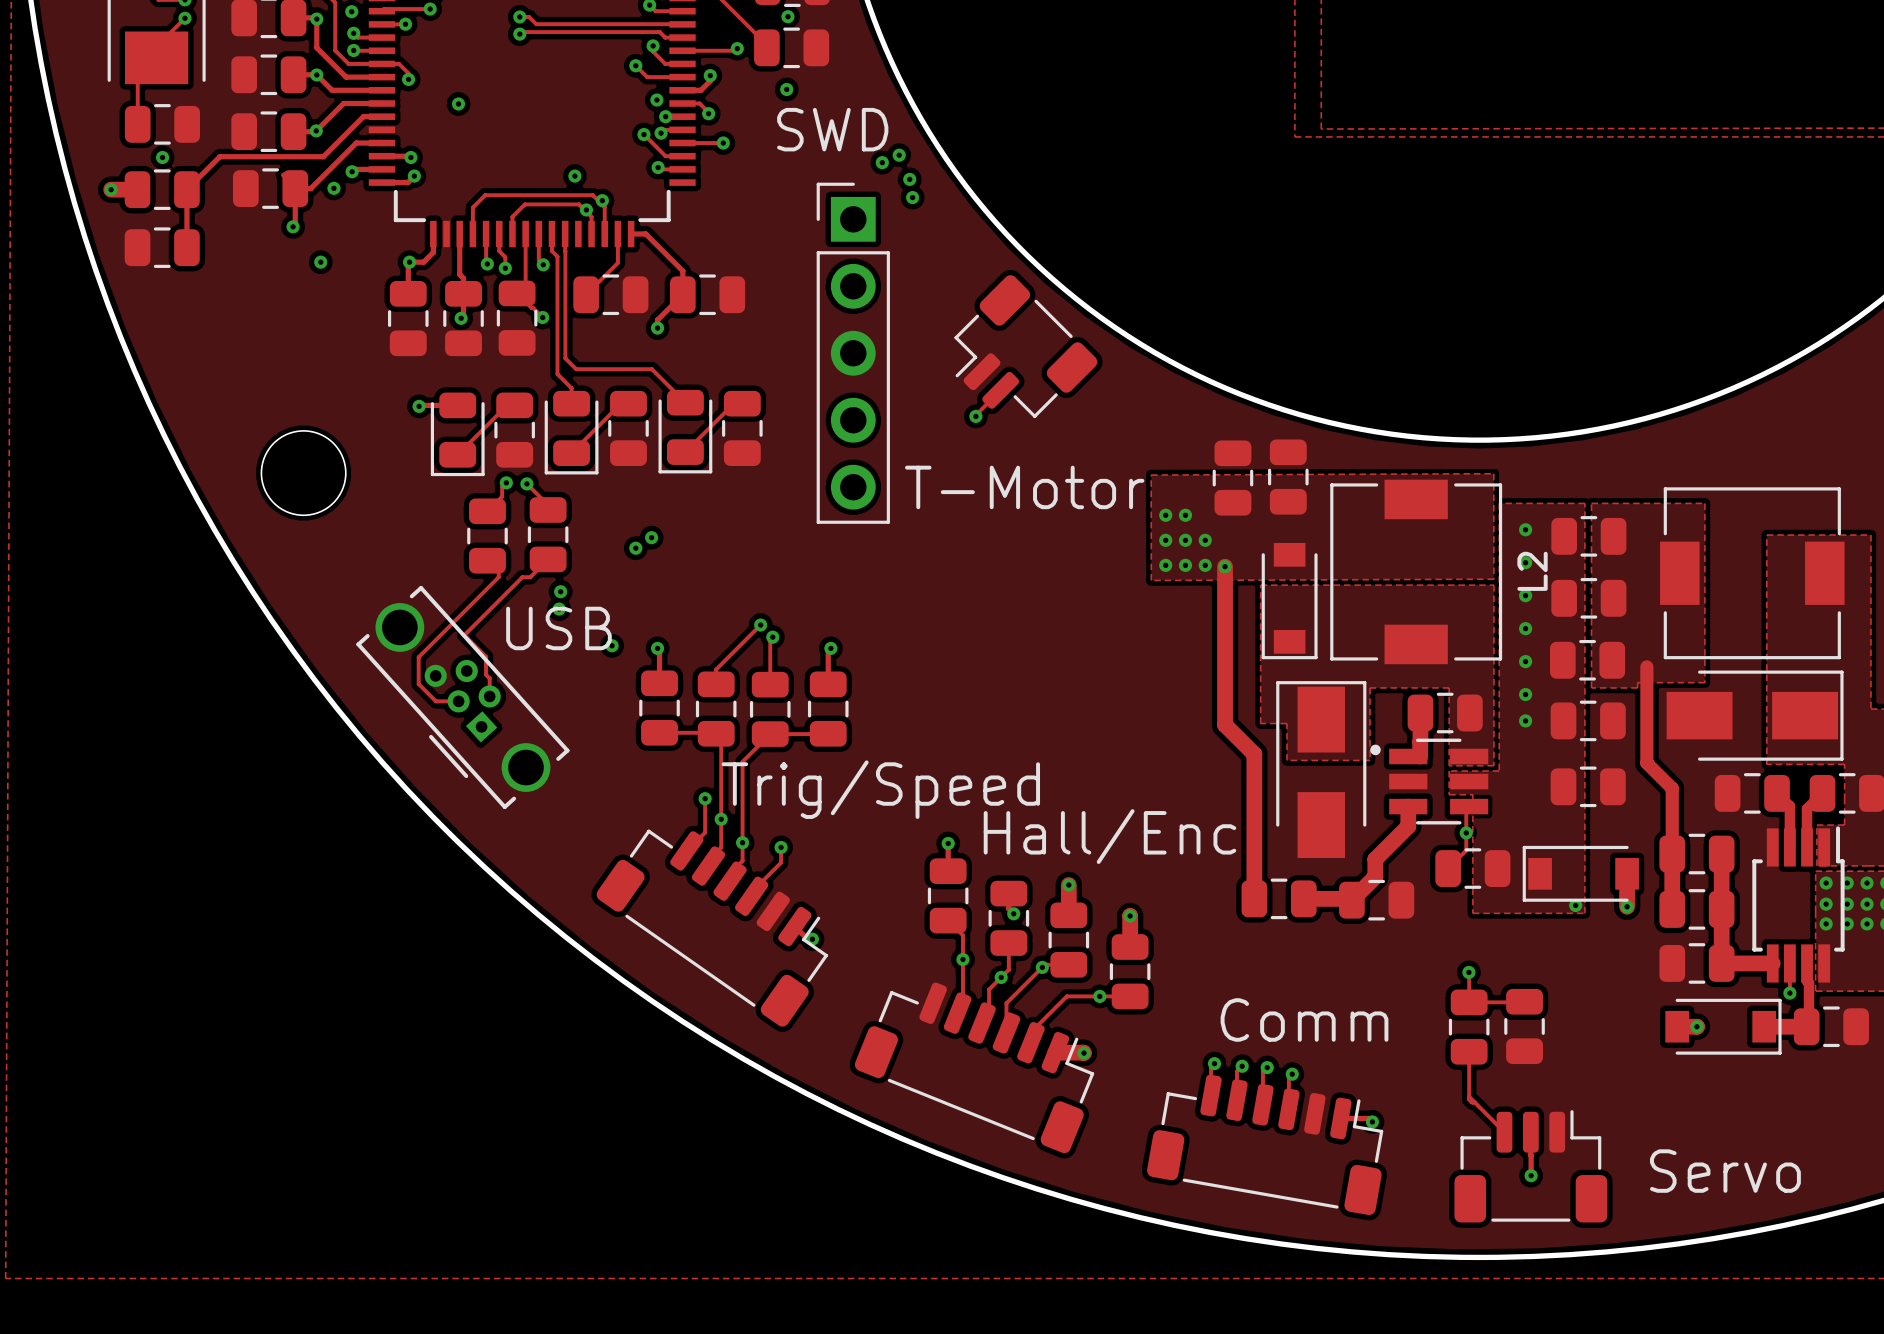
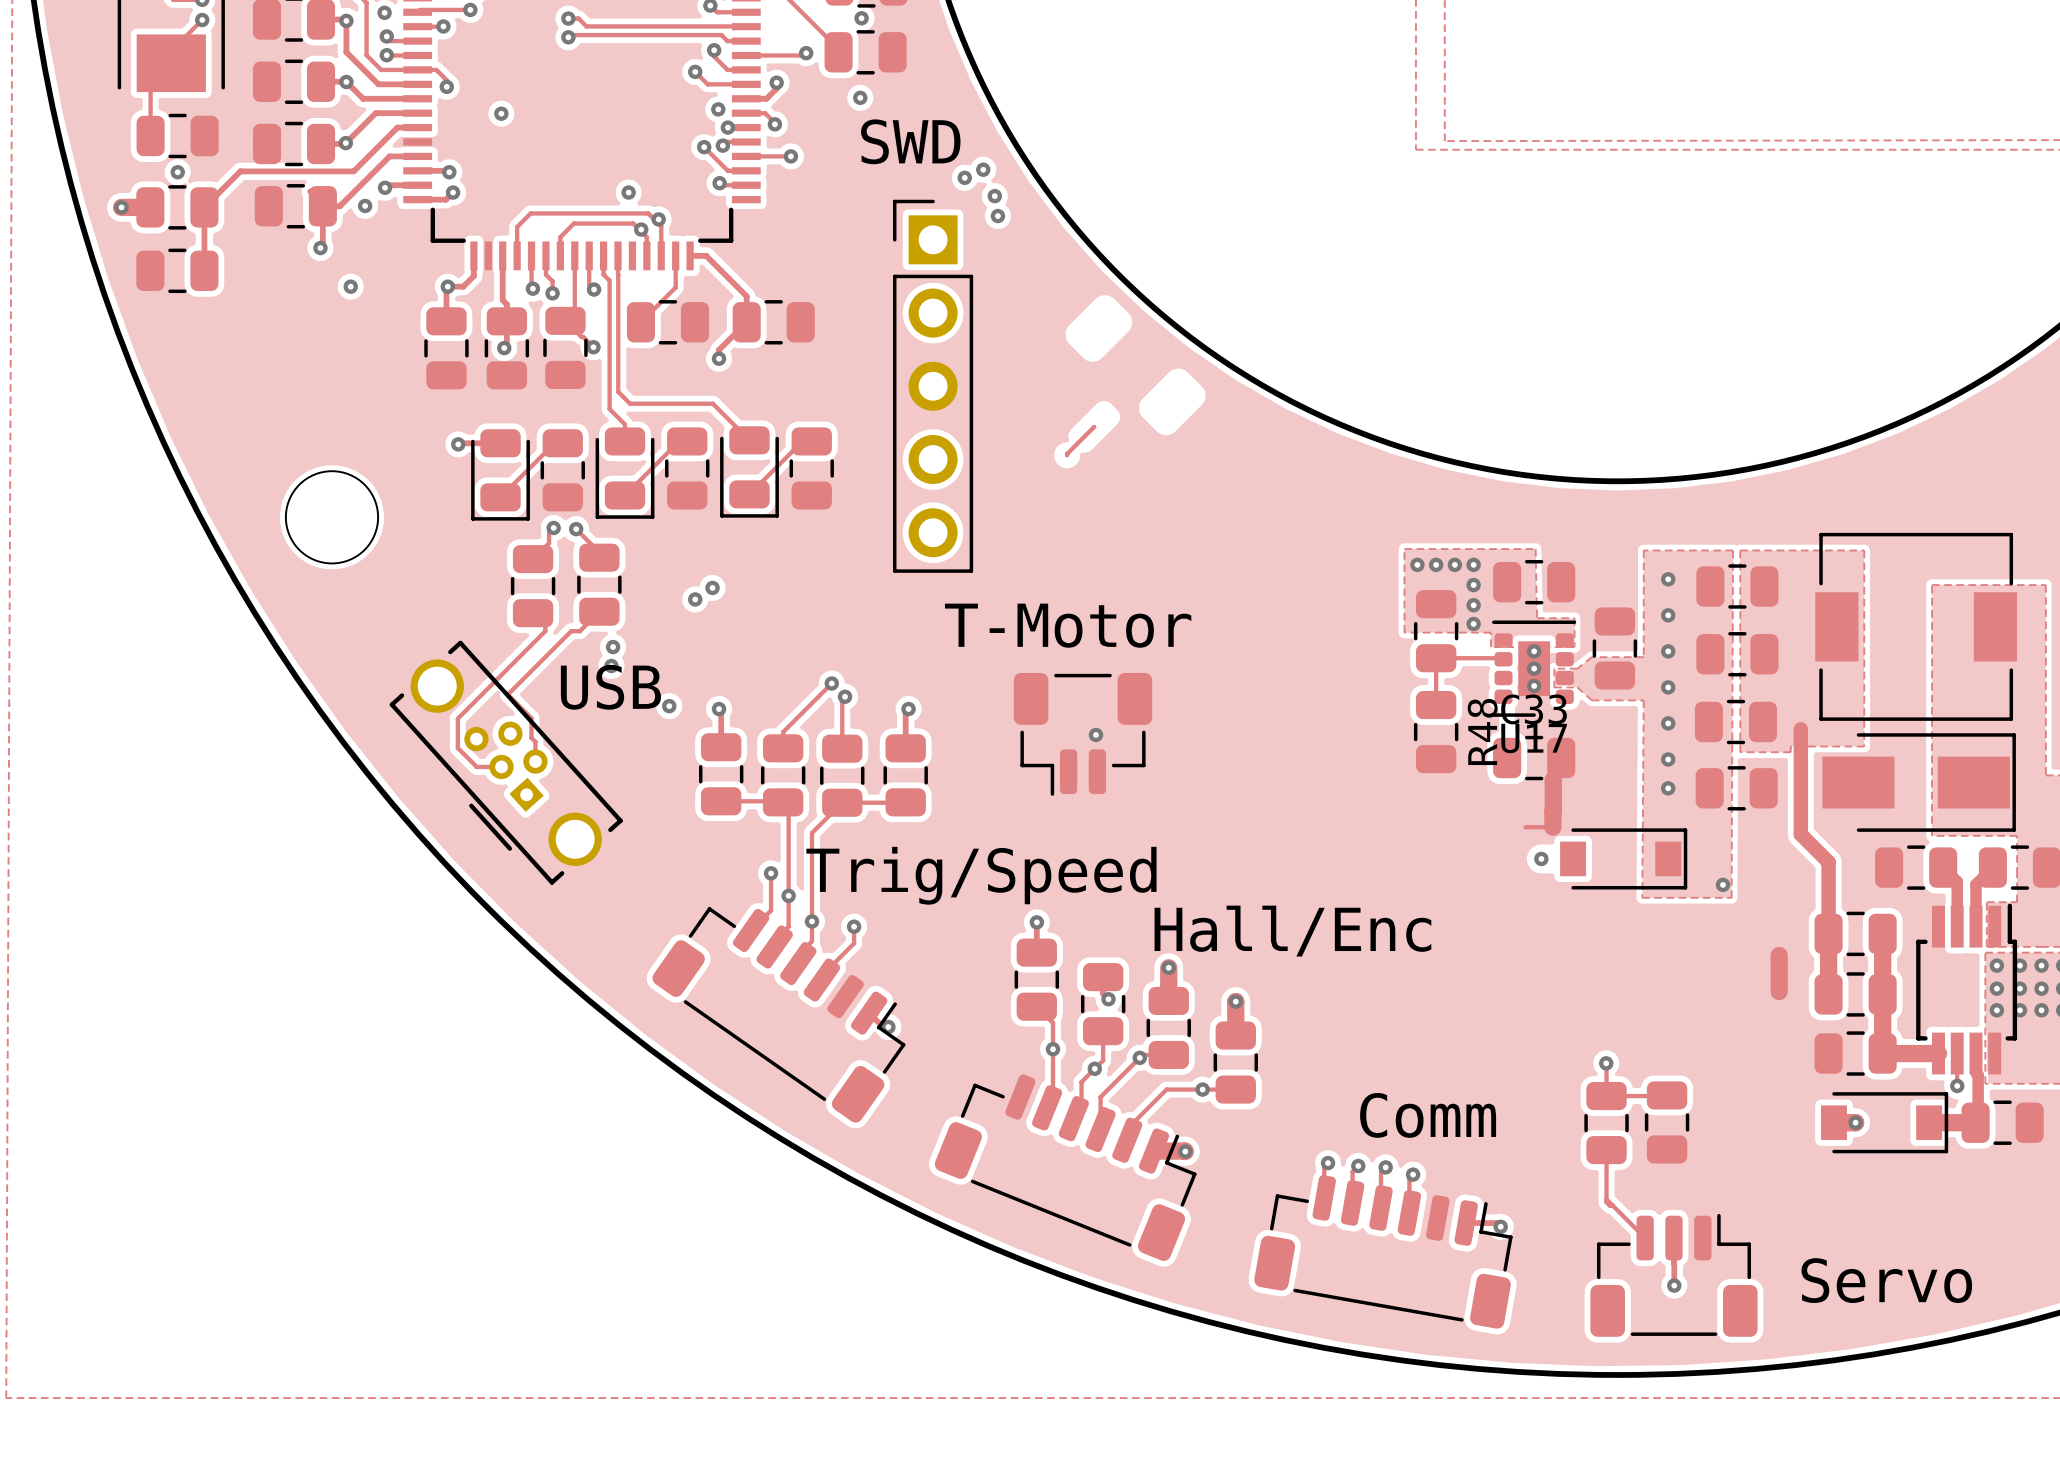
part: (1025, 346) -> none
via: (975, 416) -> none
zone outline: (1493, 473) (1151, 475) (1151, 580) (1493, 579) (1493, 473) -> none
part: (1288, 477) -> none
part: (1232, 478) -> none
text position: T-Motor (1024, 487) -> T-Motor (1068, 625)
zone outline: none -> (1404, 549) (1404, 632) (1490, 632) (1490, 647) (1574, 647) (1574, 618) (1537, 618) (1535, 549) (1404, 549)
zone outline: (1503, 503) (1499, 503) (1499, 771) (1449, 771) (1449, 794) (1472, 794) (1472, 913) (1584, 913) (1584, 503) -> (1643, 550) (1643, 657) (1591, 657) (1577, 668) (1554, 668) (1554, 687) (1577, 687) (1591, 700) (1643, 700) (1642, 897) (1731, 897) (1733, 550)
via: (1165, 515) -> none
via: (1185, 515) -> none
via: none -> (1417, 564)
via: none -> (1436, 564)
via: none -> (1454, 564)
via: none -> (1473, 564)
part: none -> (1534, 582)
via: none -> (1473, 585)
via: (1165, 540) -> none
via: (1185, 540) -> none
via: (1205, 540) -> none
via: none -> (1473, 605)
via: (1165, 565) -> none
via: (1185, 565) -> none
via: (1205, 565) -> none
track: (1225, 566) (1225, 724) (1254, 754) (1254, 898) -> none
via: (1225, 566) -> none
via: none -> (1473, 623)
L2: (1416, 571) -> none
part: none -> (1436, 631)
zone outline: (1260, 585) (1260, 723) (1287, 723) (1287, 760) (1370, 760) (1370, 687) (1449, 687) (1449, 765) (1493, 765) (1493, 585) (1260, 585) -> none
part: none -> (1614, 648)
via: none -> (1534, 651)
part: (1289, 601) -> none
track: none -> (1503, 659) (1436, 658) (1436, 705)
U17: none -> (1534, 668)
via: none -> (1534, 668)
via: none -> (1534, 685)
R48: none -> (1436, 732)
part: none -> (1082, 734)
via: none -> (1095, 734)
C33: none -> (1534, 758)
part: (1445, 713) -> none
part: (1321, 769) -> none
part: (1429, 781) -> none
via: none -> (1541, 858)
part: (1588, 786) -> none
text position: Trig/Speed (880, 789) -> Trig/Speed (981, 875)
track: (1408, 806) (1408, 826) (1375, 859) (1375, 876) (1351, 900) (1303, 898) -> none
track: (1469, 806) (1466, 809) (1466, 850) (1448, 868) -> none
via: none -> (1723, 884)
via: (1466, 832) -> none
text position: Hall/Enc (1109, 836) -> Hall/Enc (1292, 931)
part: (1472, 868) -> none
part rotation: 0° (1580, 873) -> 180° (1623, 858)
part position: (1580, 873) -> (1623, 858)
part: (1279, 898) -> none
part: (1376, 900) -> none
via: (1575, 905) -> none
via: (1627, 906) -> none

